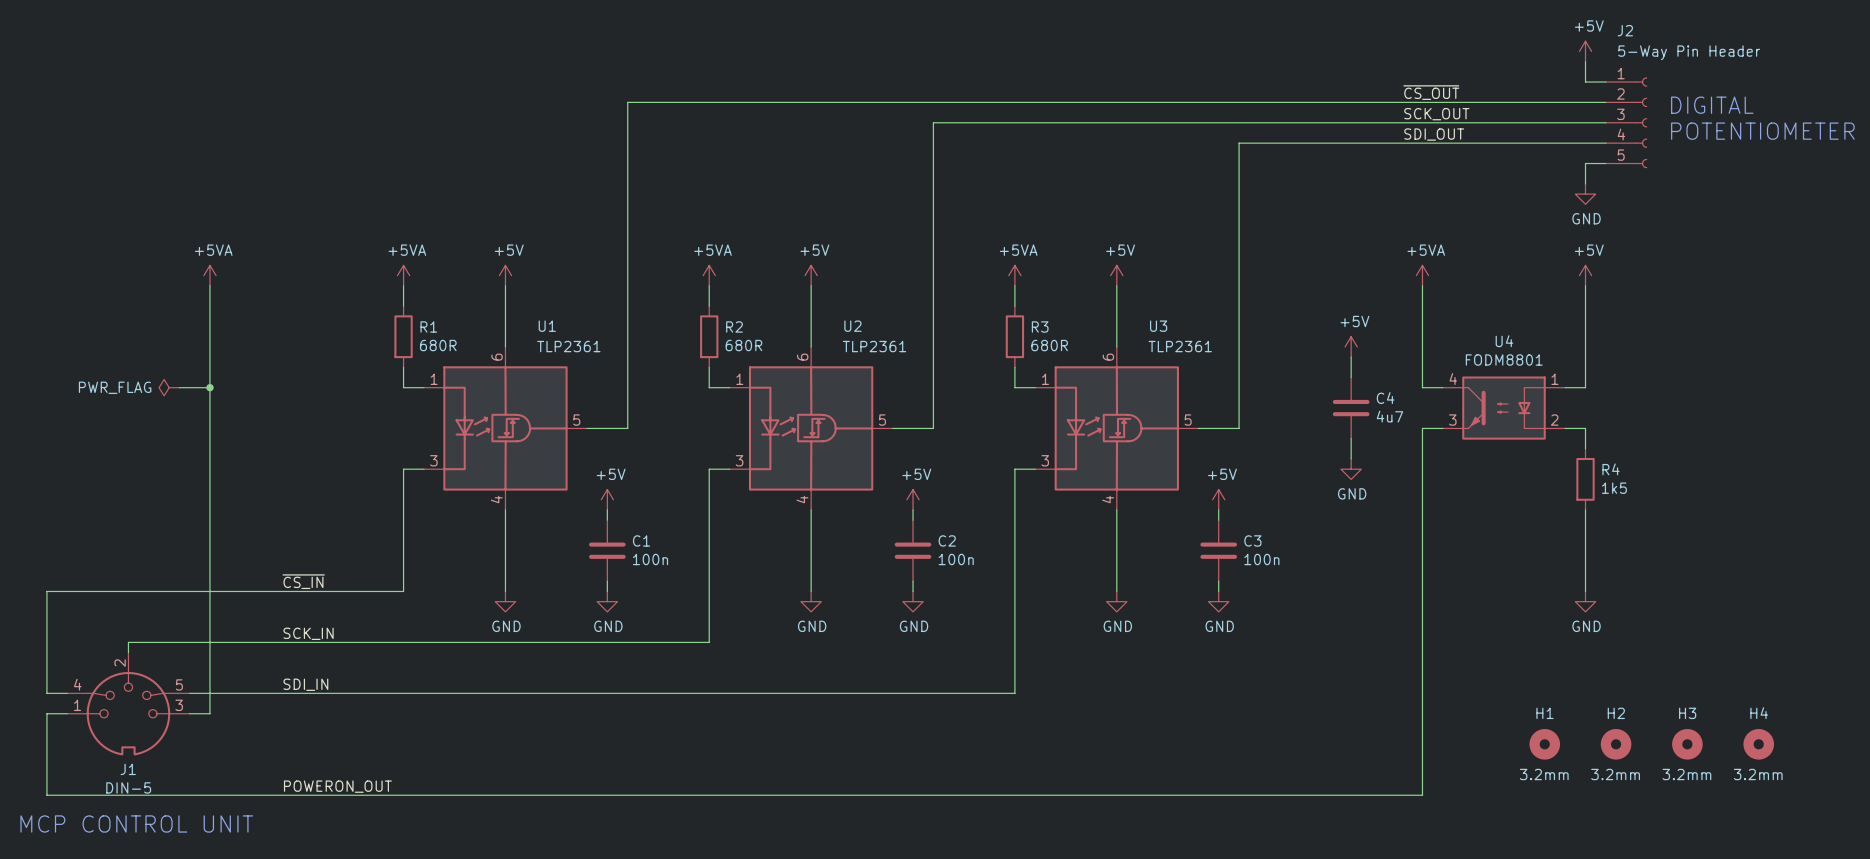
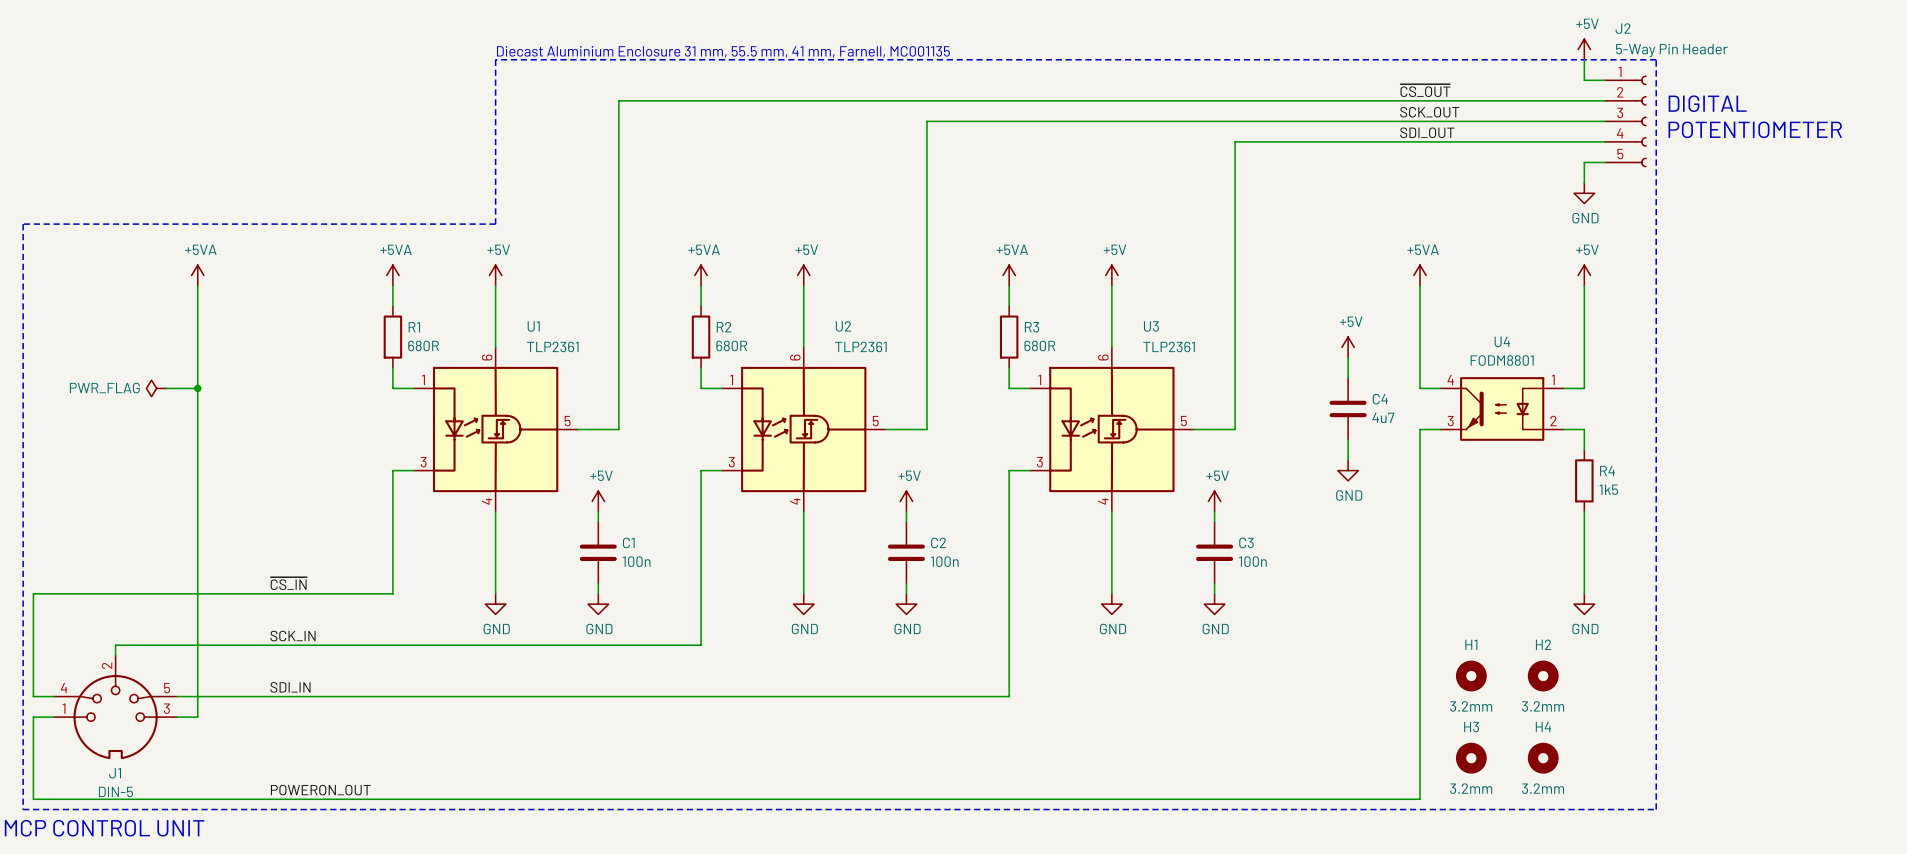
text: none -> Diecast Aluminium Enclosure 31 mm, 55.5 mm, 41 mm, Farnell, MC001135 (723, 51)
line: none -> (495, 59) (1656, 59) (1656, 809) (23, 809) (23, 224) (495, 224) (495, 59)
H1 position: (1544, 744) -> (1471, 676)
H2 position: (1616, 744) -> (1543, 676)
H3 position: (1687, 744) -> (1471, 758)
H4 position: (1758, 744) -> (1543, 758)

